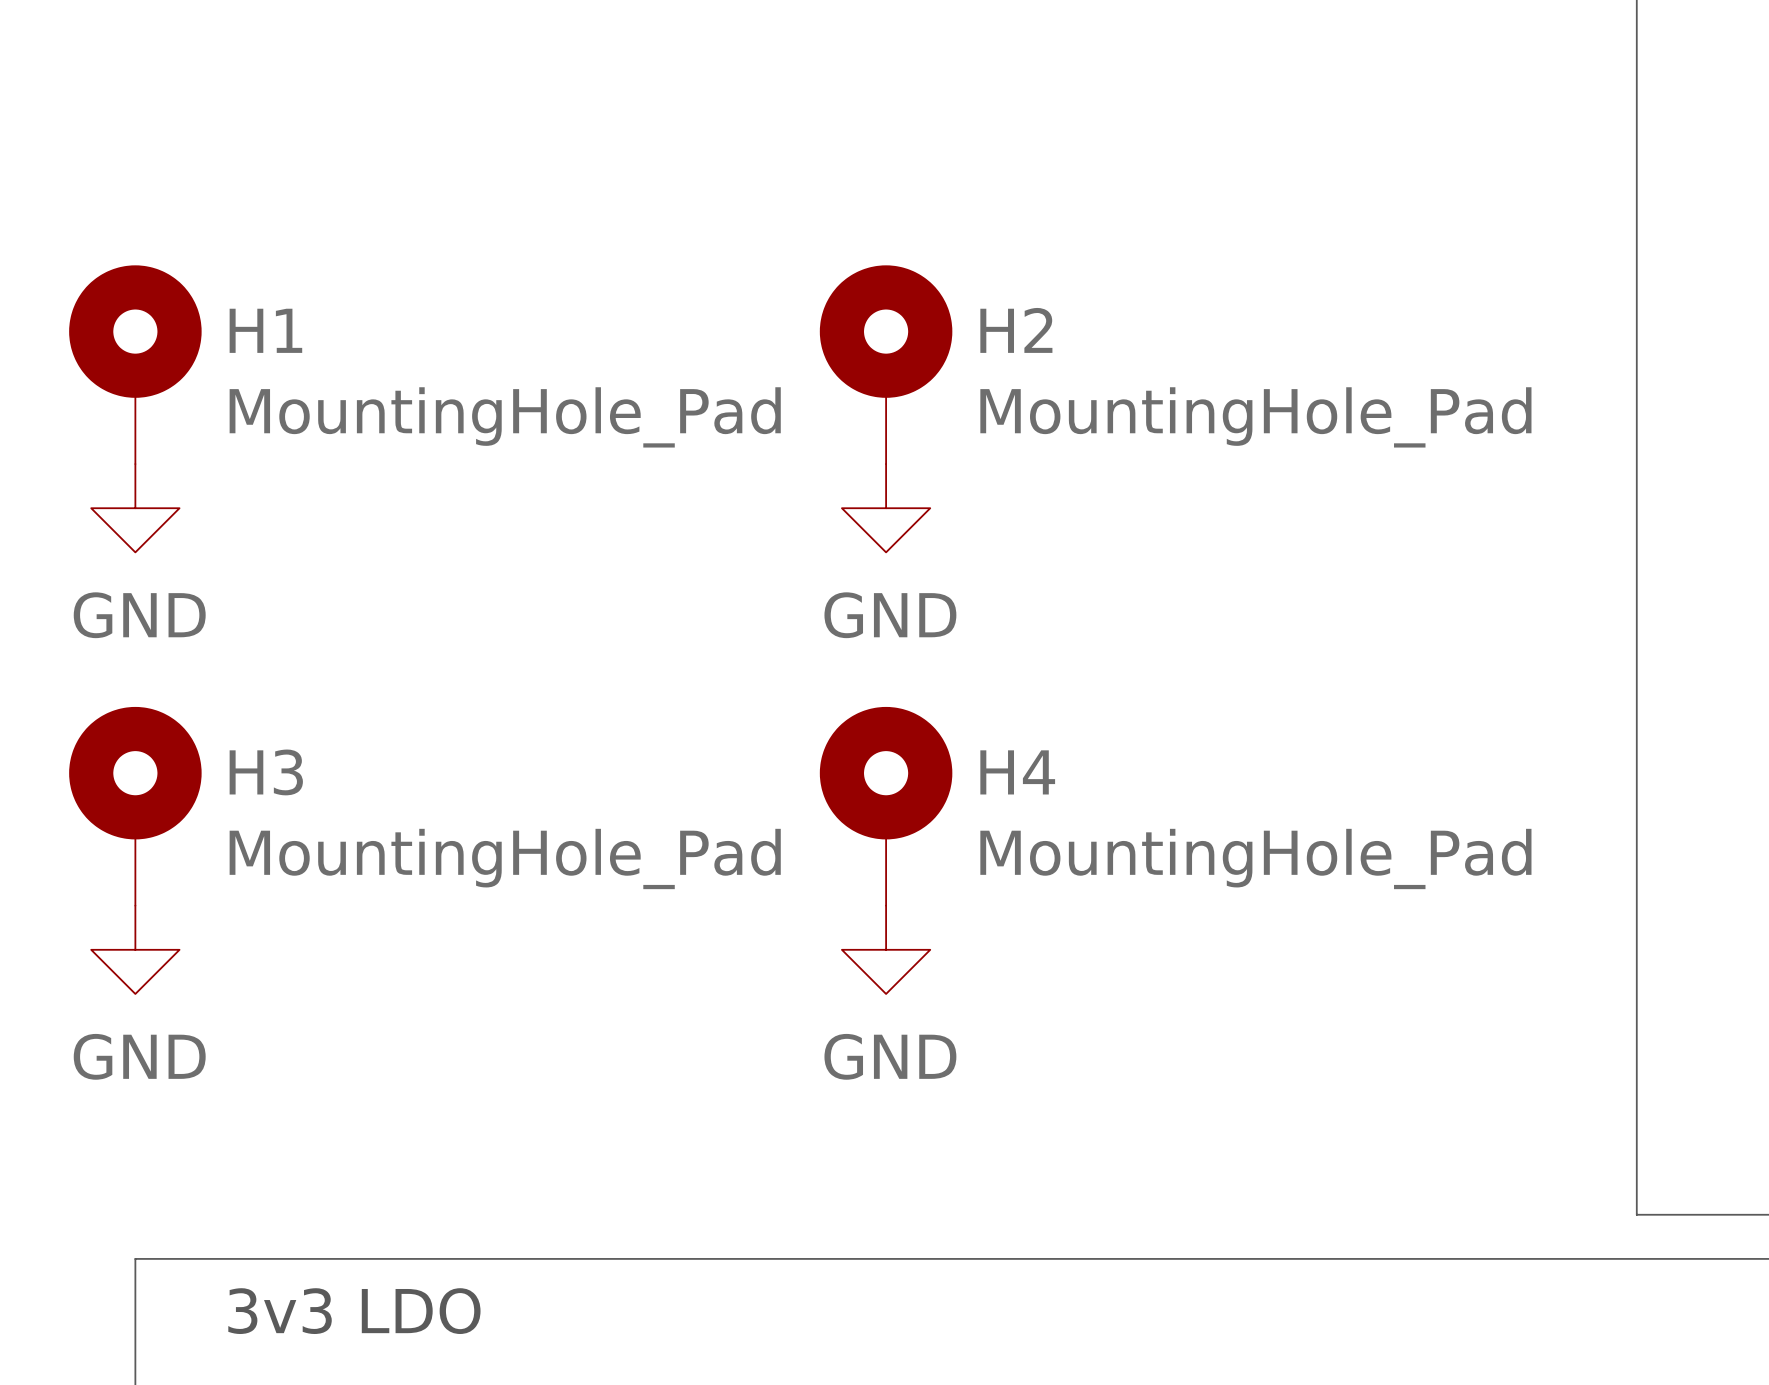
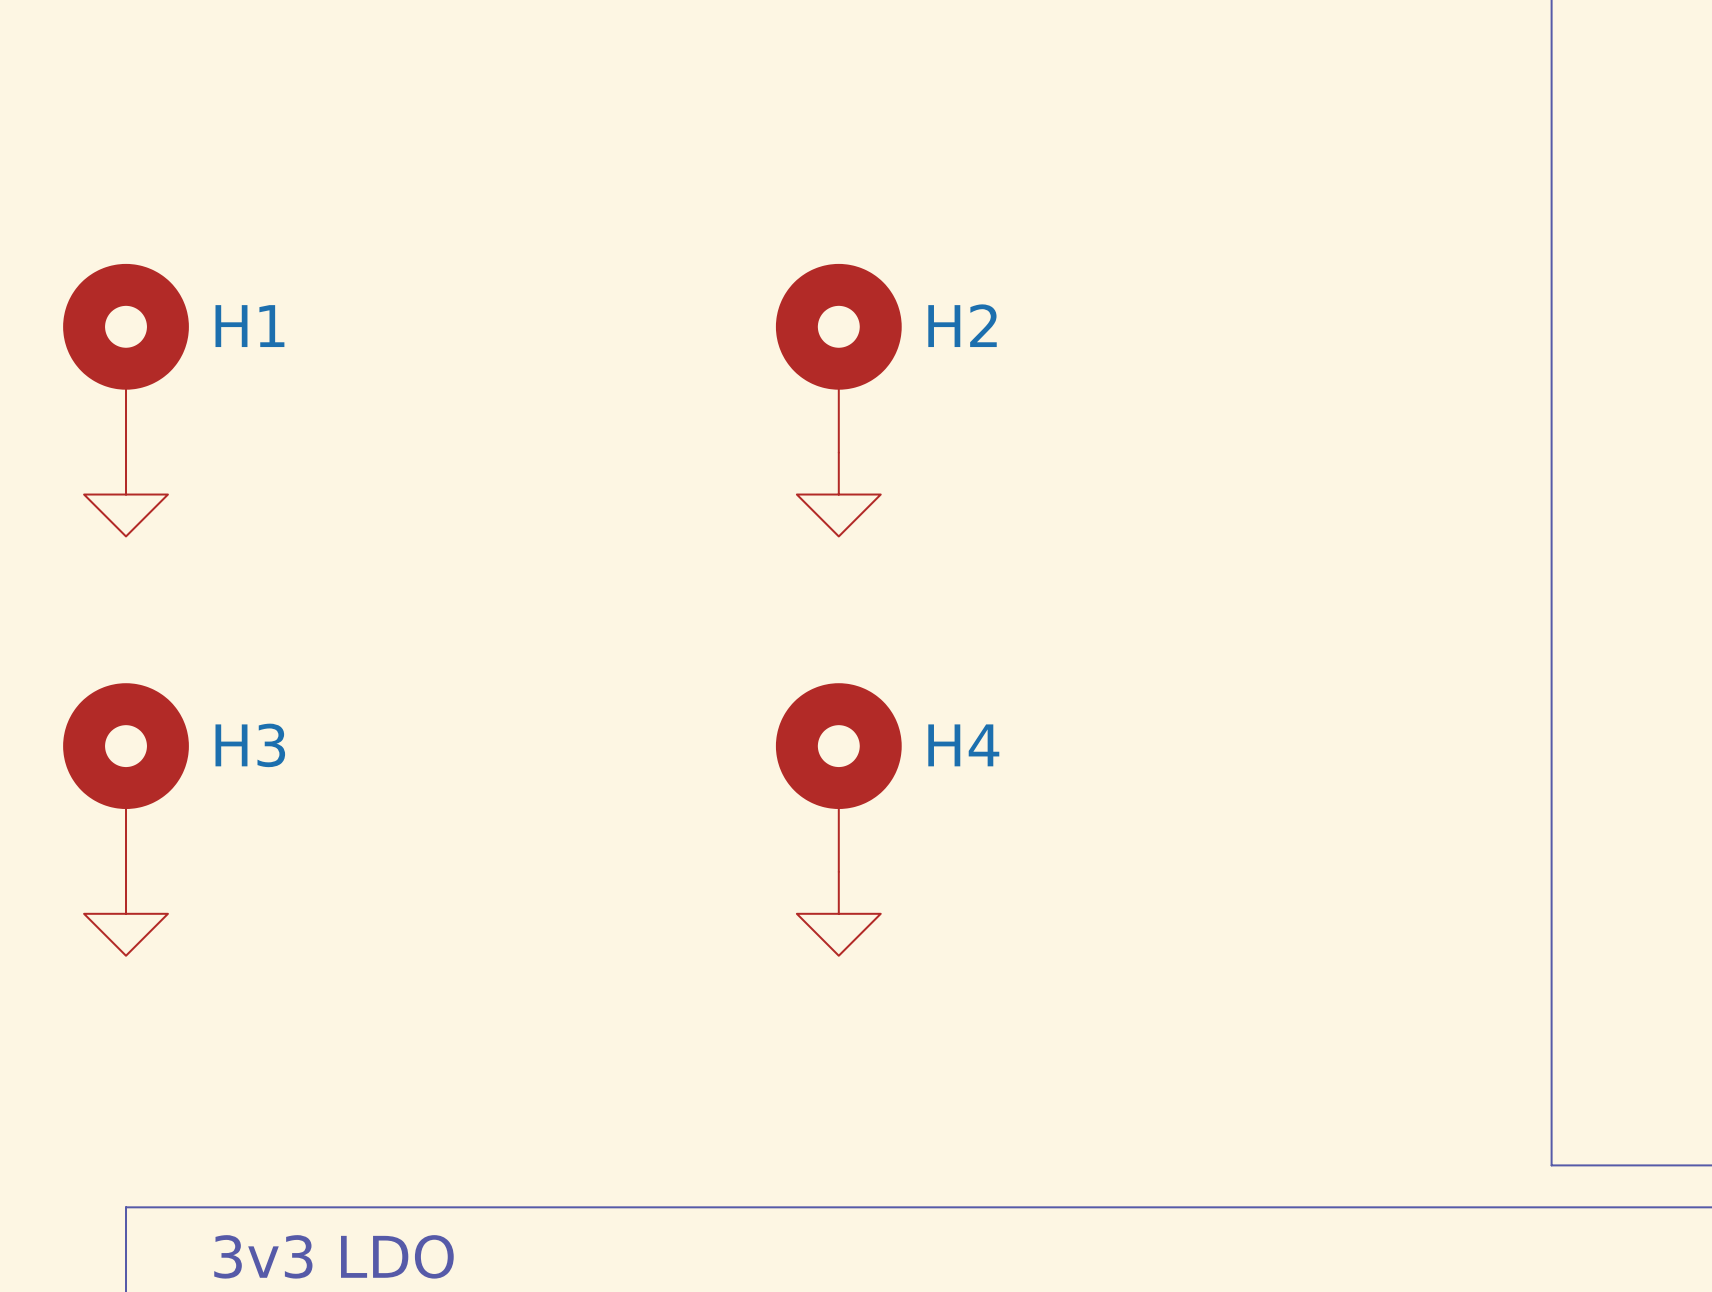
H1 value: MountingHole_Pad (505, 417) -> none
H2 value: MountingHole_Pad (1255, 417) -> none
power symbol text: GND (139, 615) -> none
power symbol text: GND (890, 615) -> none
H3 value: MountingHole_Pad (505, 858) -> none
H4 value: MountingHole_Pad (1255, 858) -> none
power symbol text: GND (139, 1056) -> none
power symbol text: GND (890, 1056) -> none

